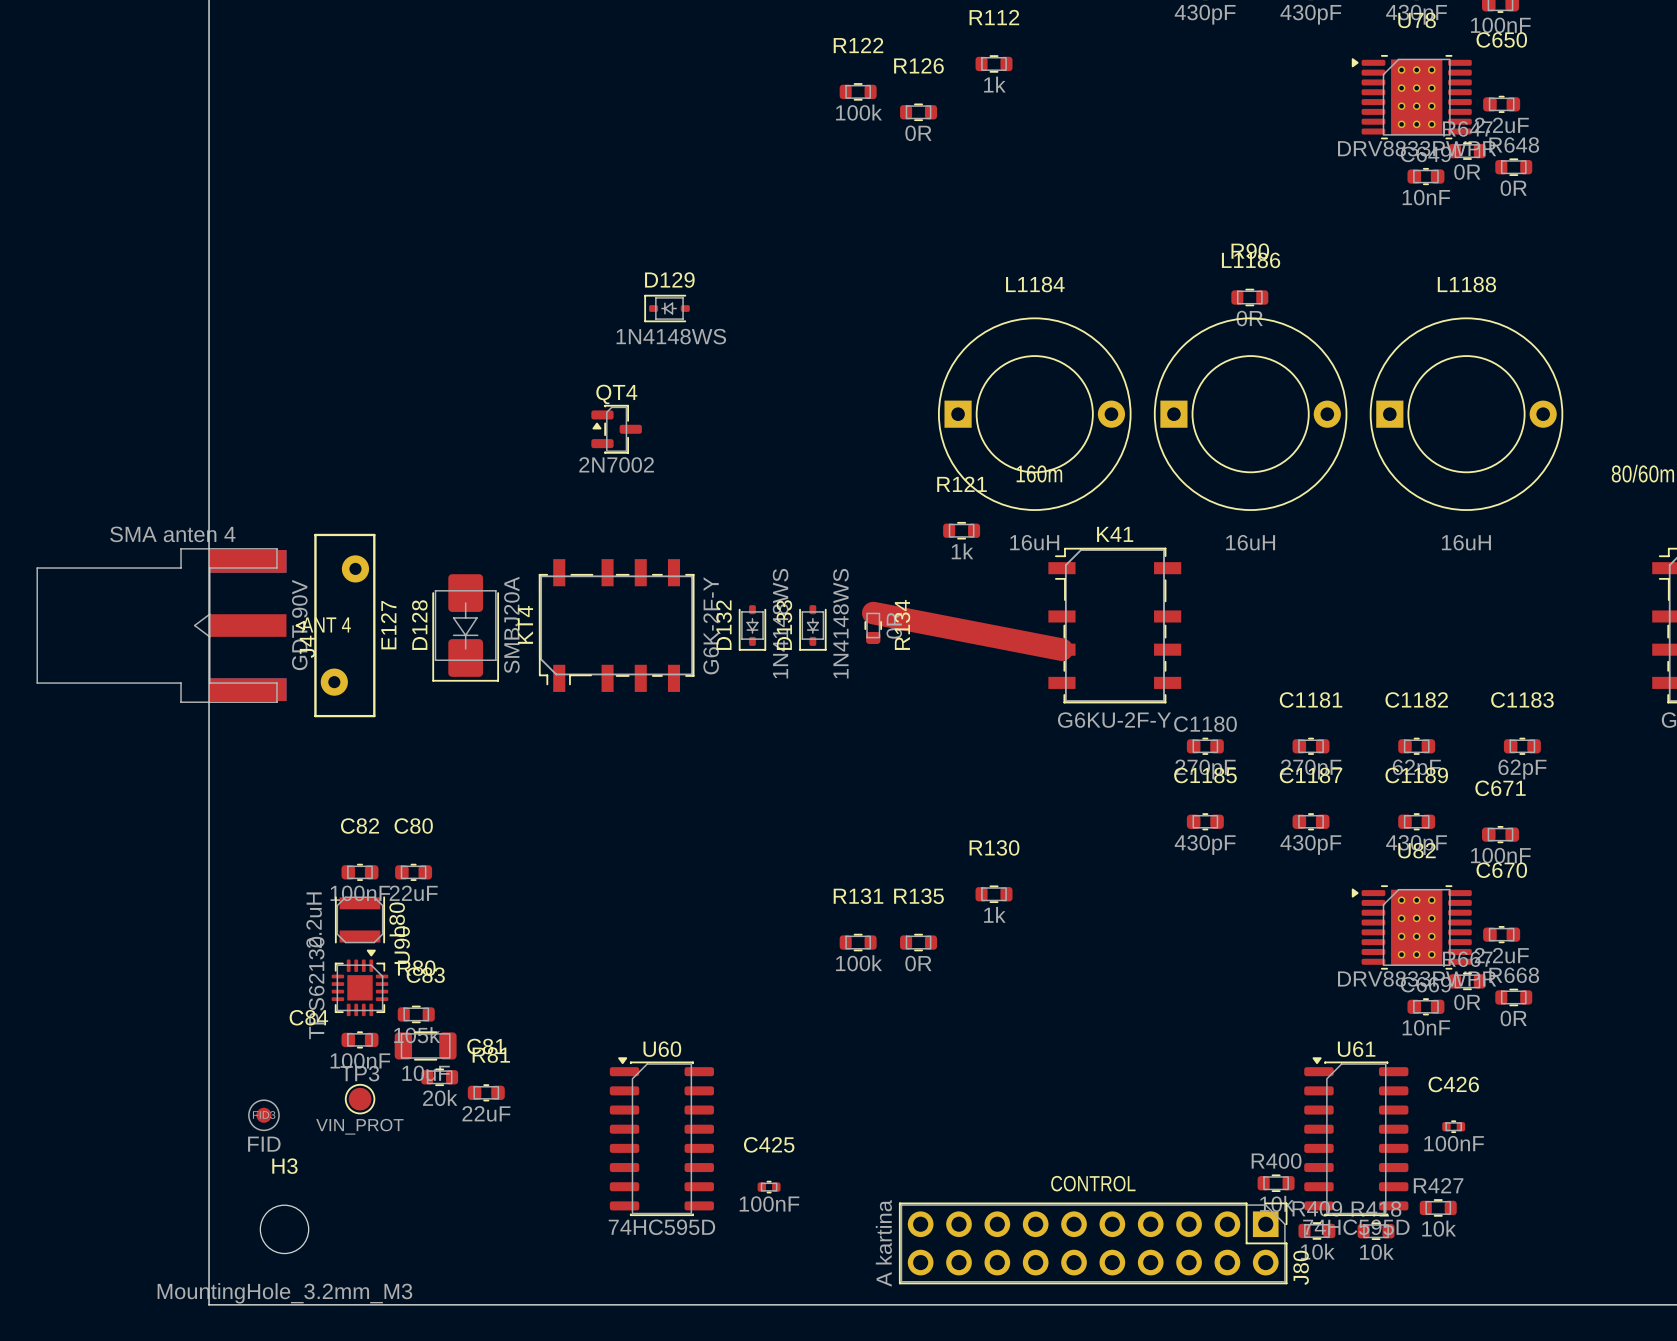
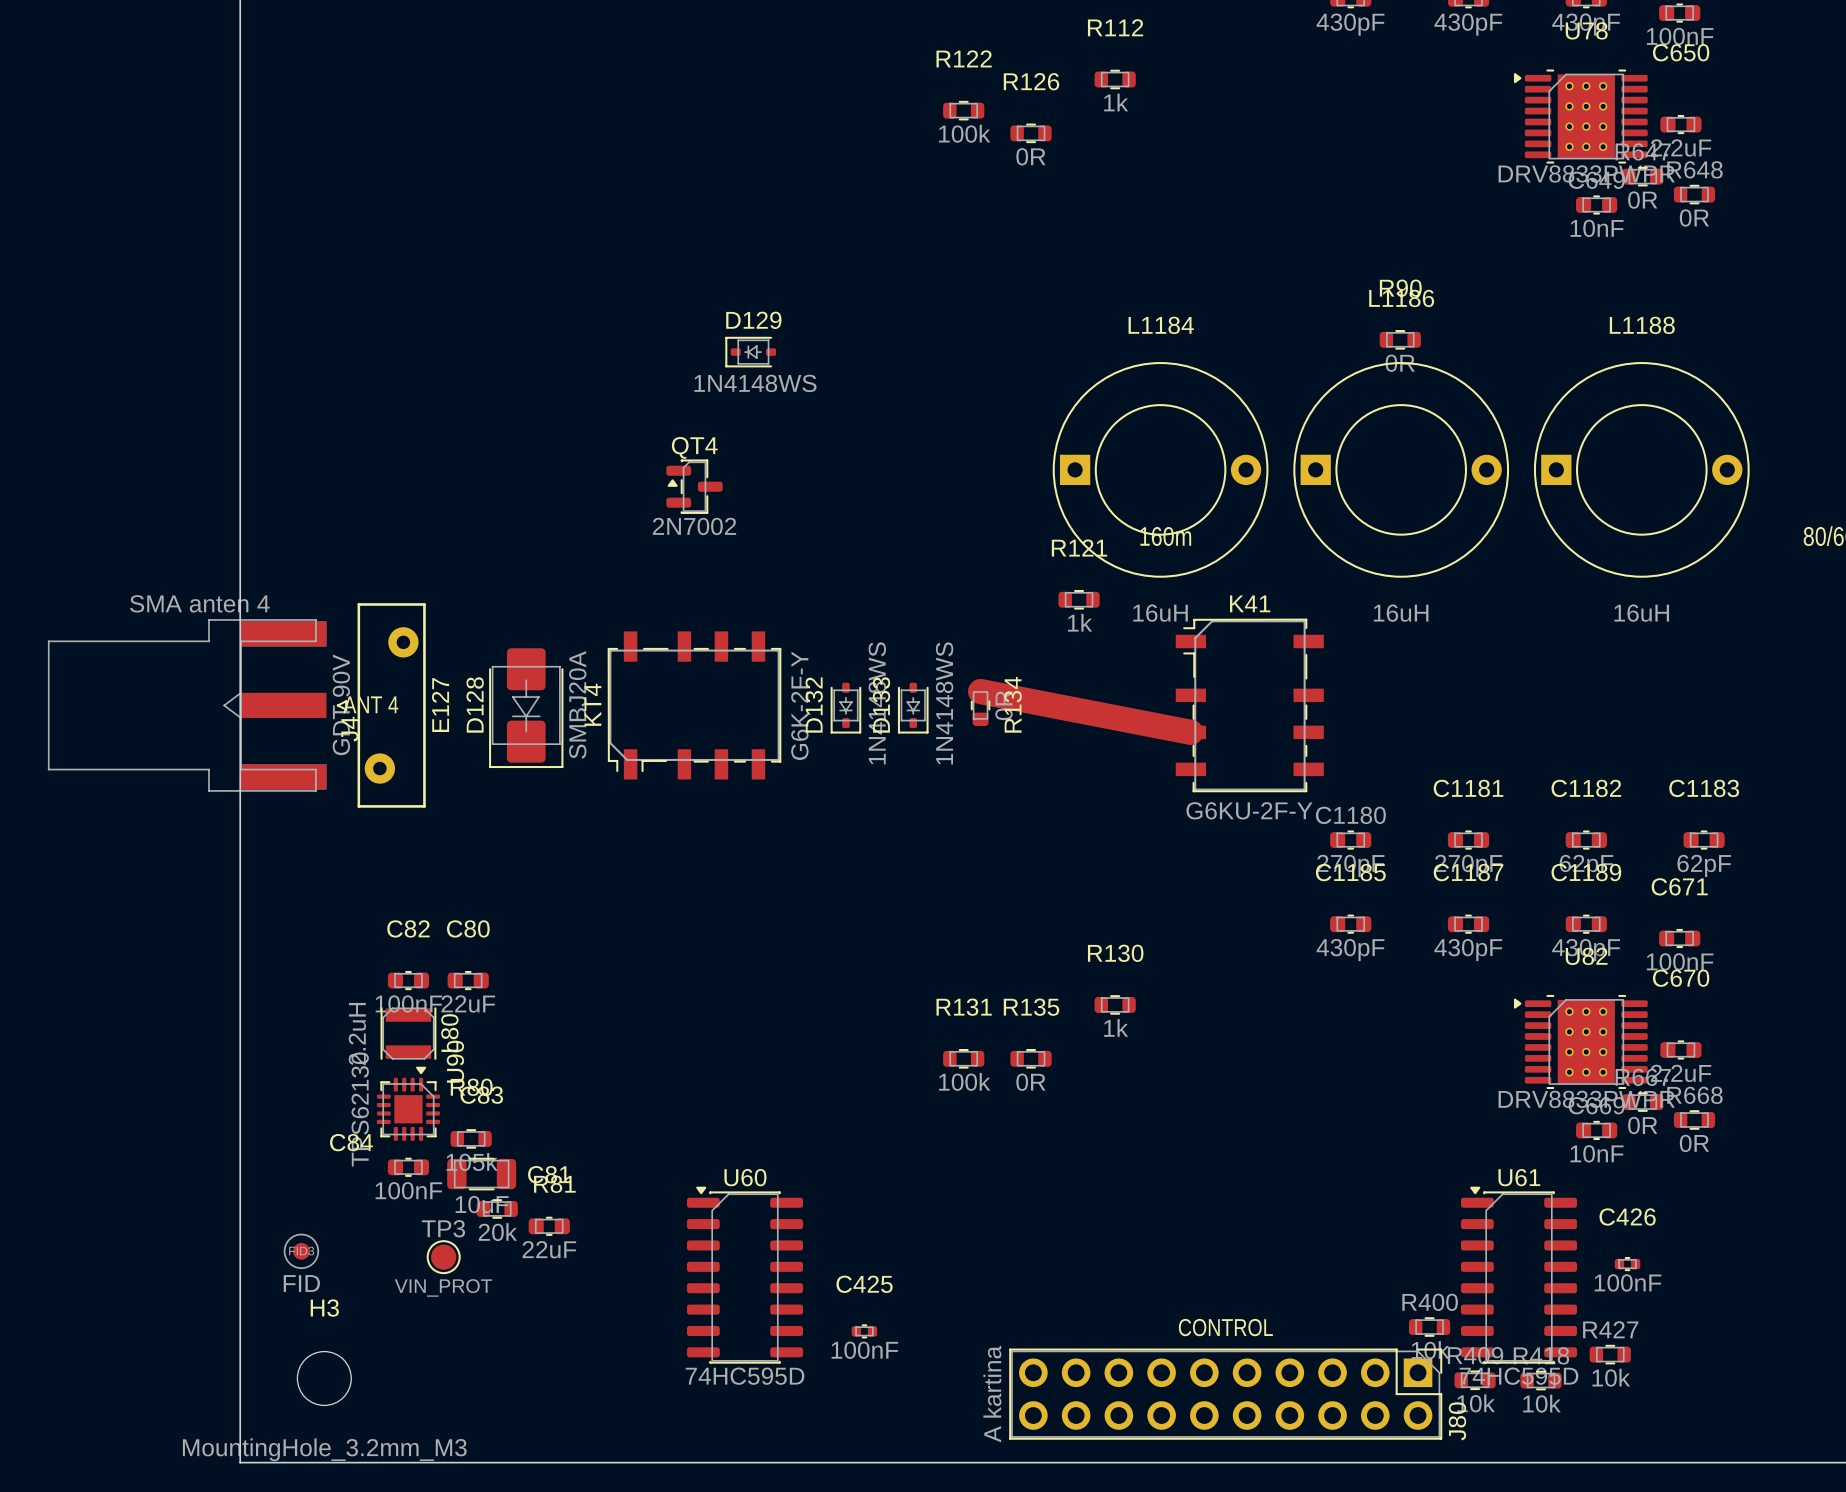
TP3 position: (360, 1099) -> (443, 1257)

